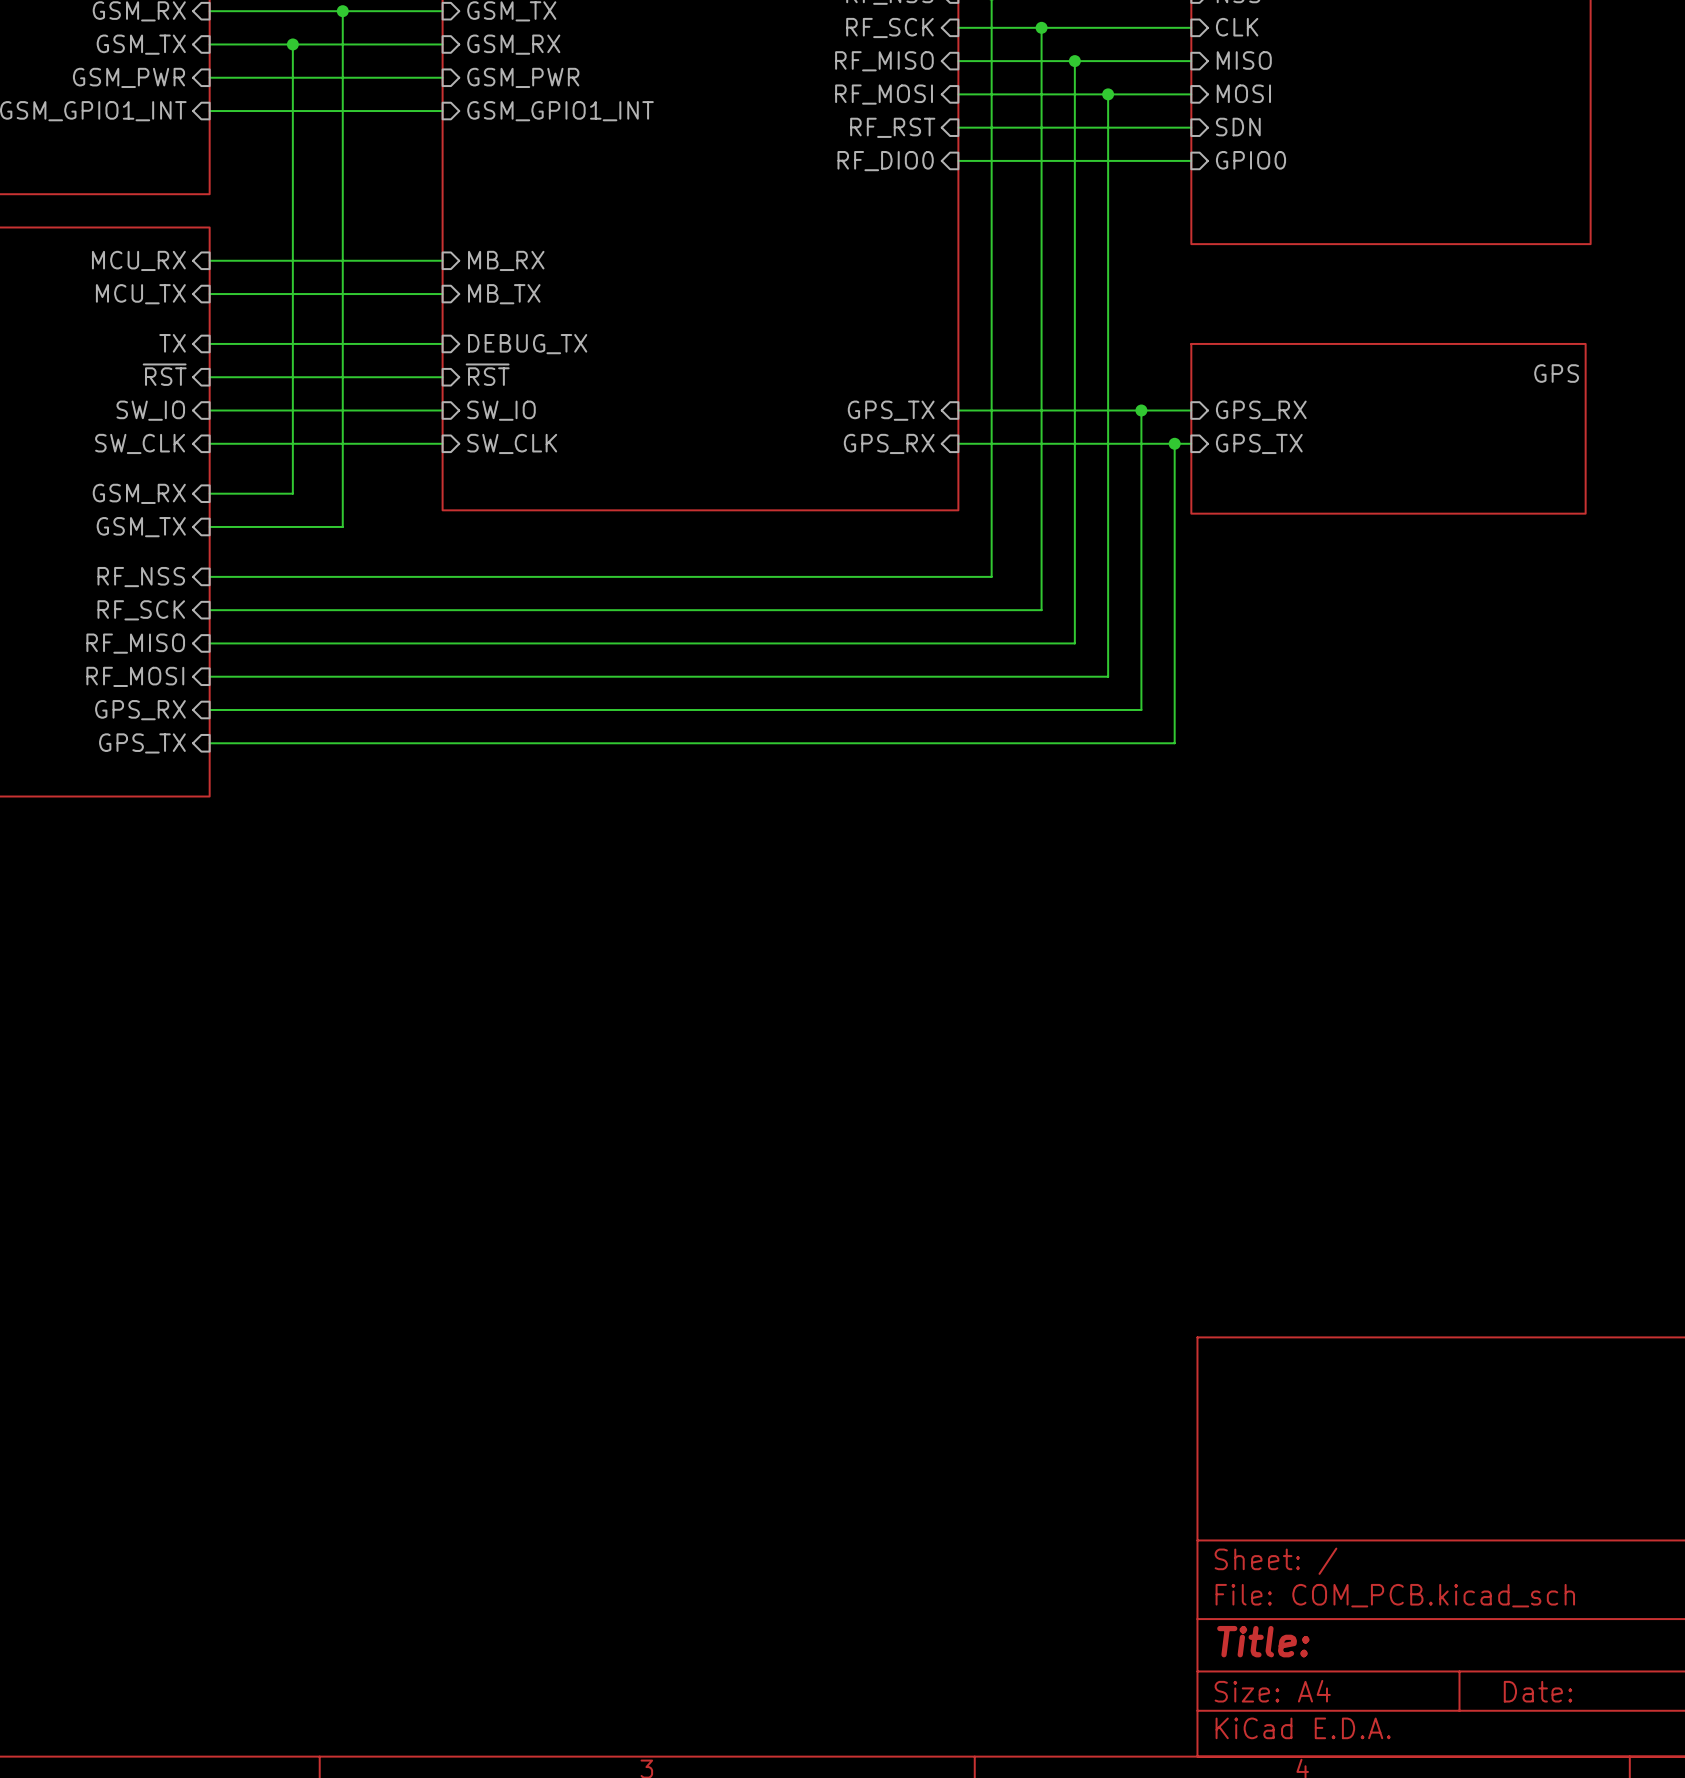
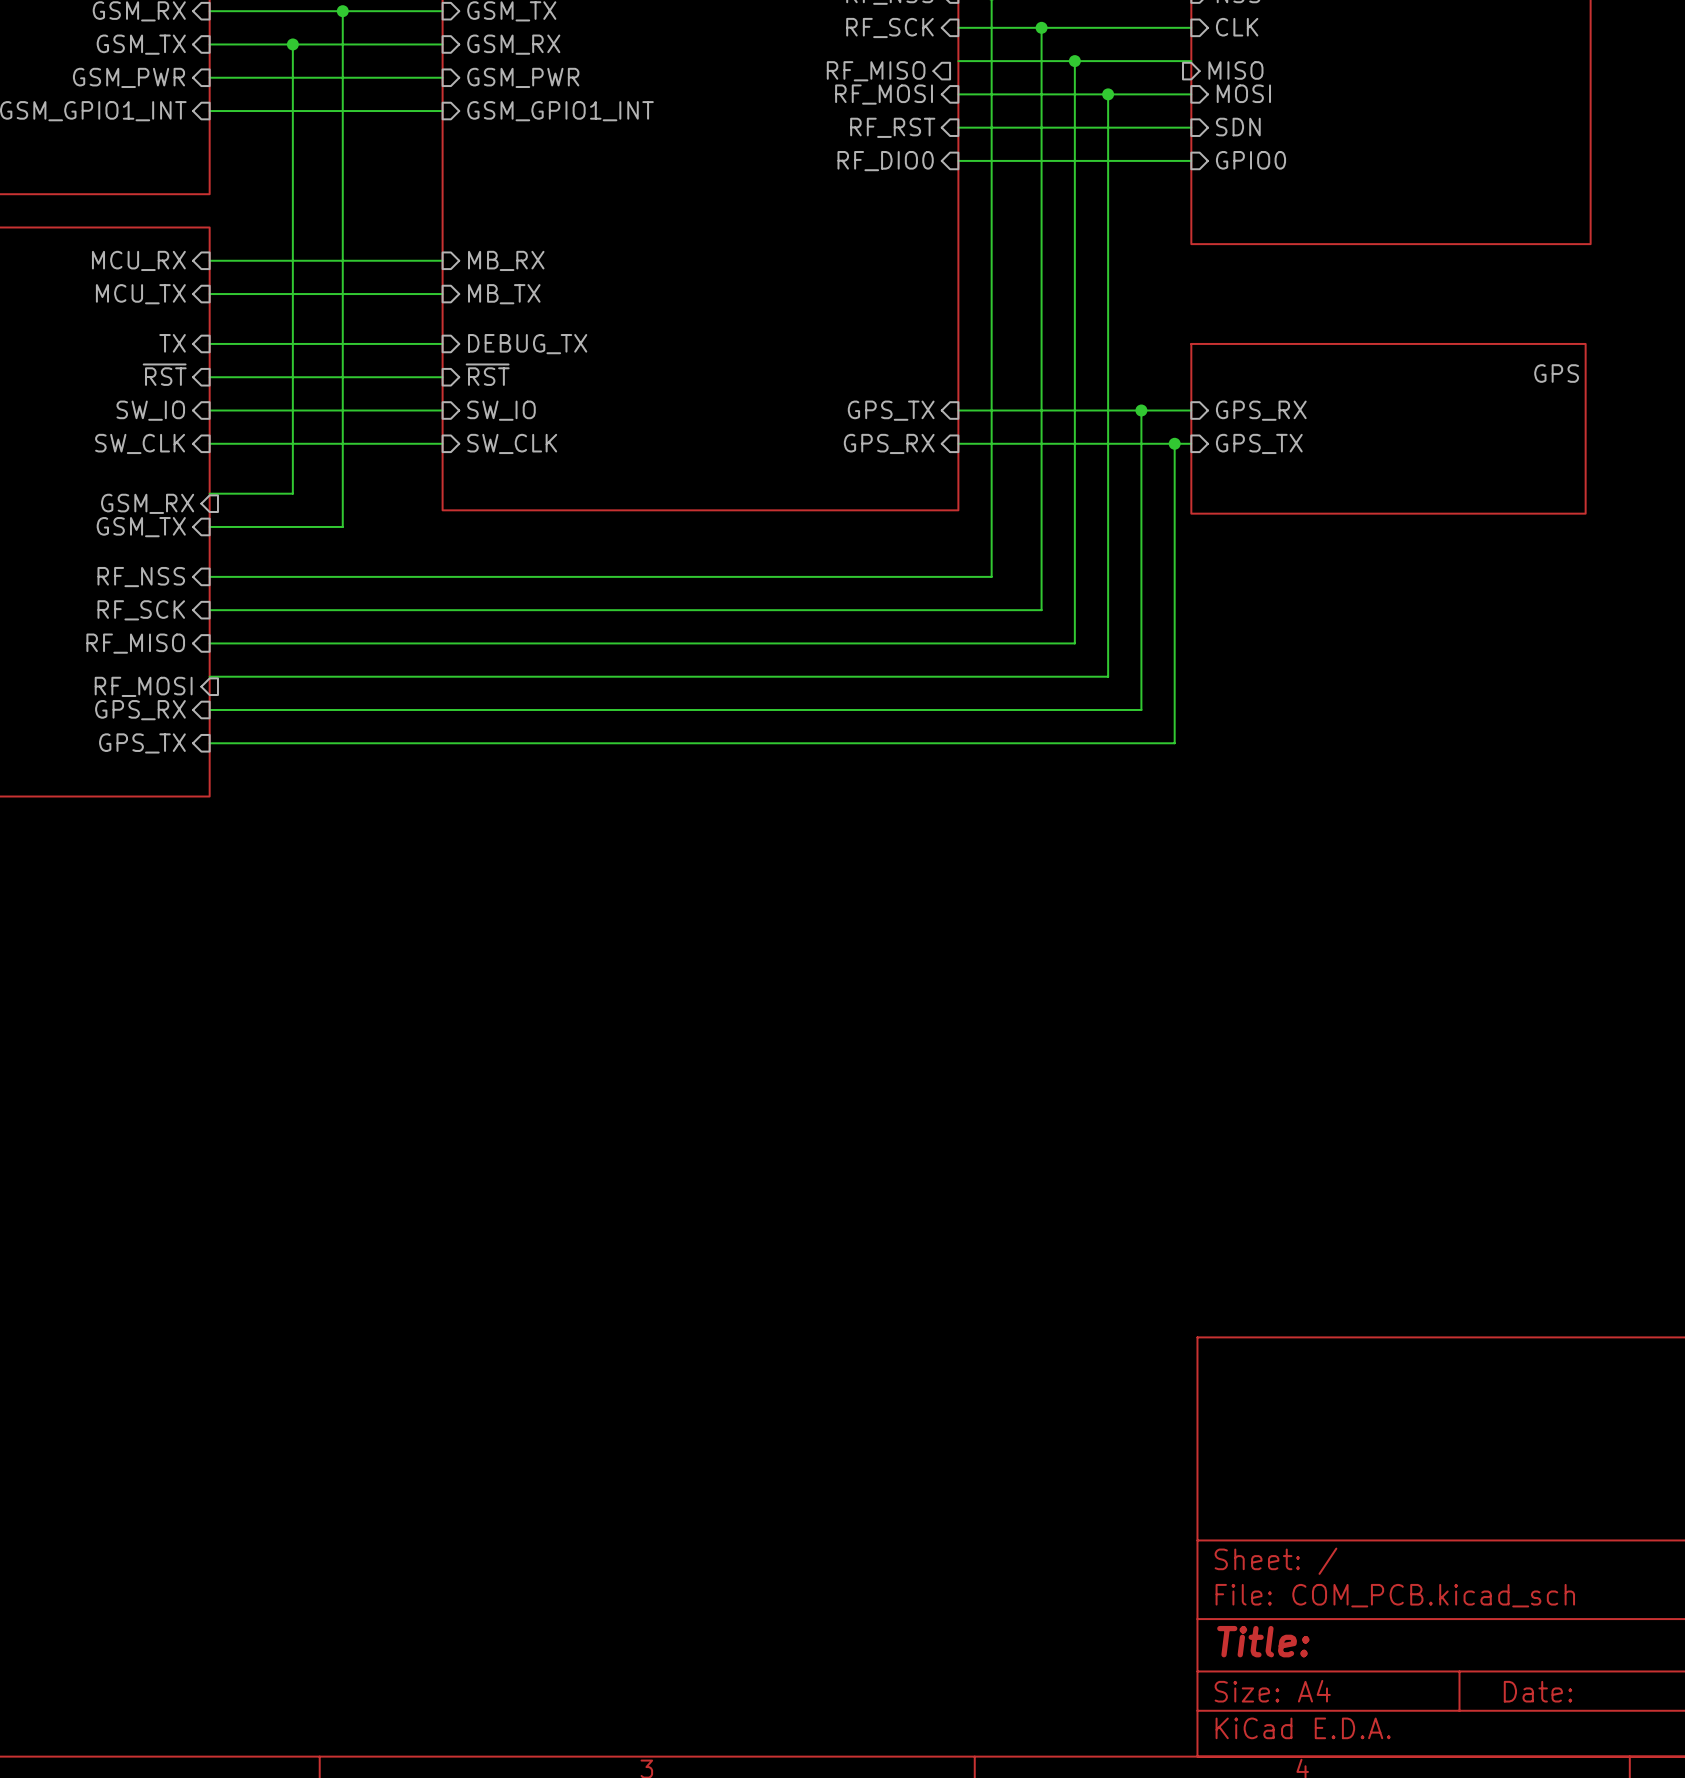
sheet pin position: MISO (1244, 60) -> MISO (1235, 70)
sheet pin position: RF_MISO (884, 61) -> RF_MISO (876, 71)
sheet pin position: GSM_RX (139, 493) -> GSM_RX (147, 503)
sheet pin position: RF_MOSI (135, 676) -> RF_MOSI (143, 686)

